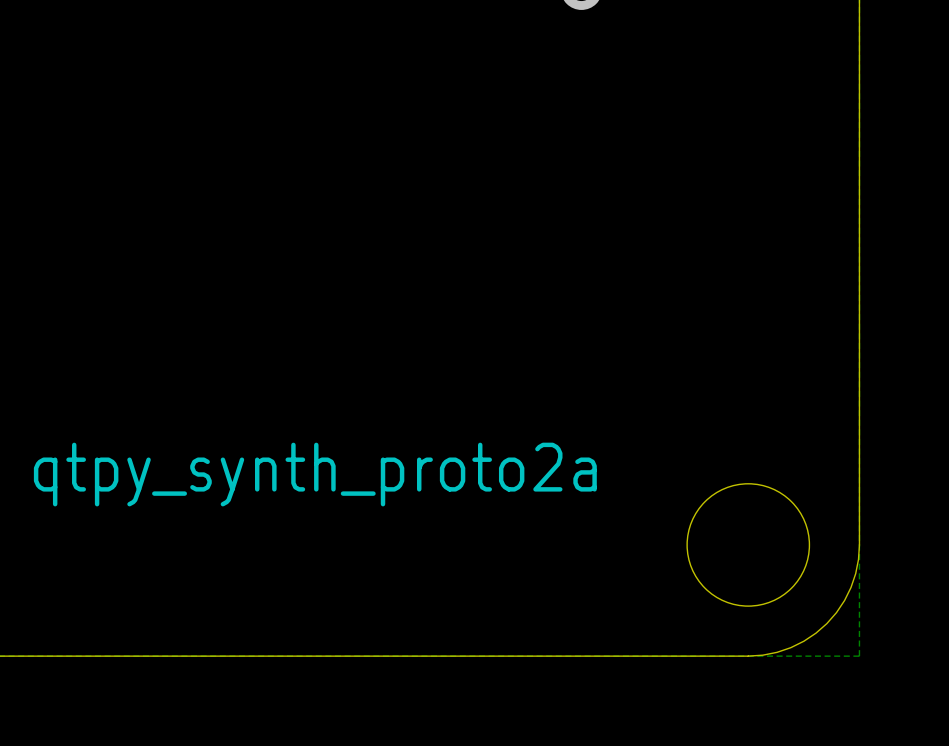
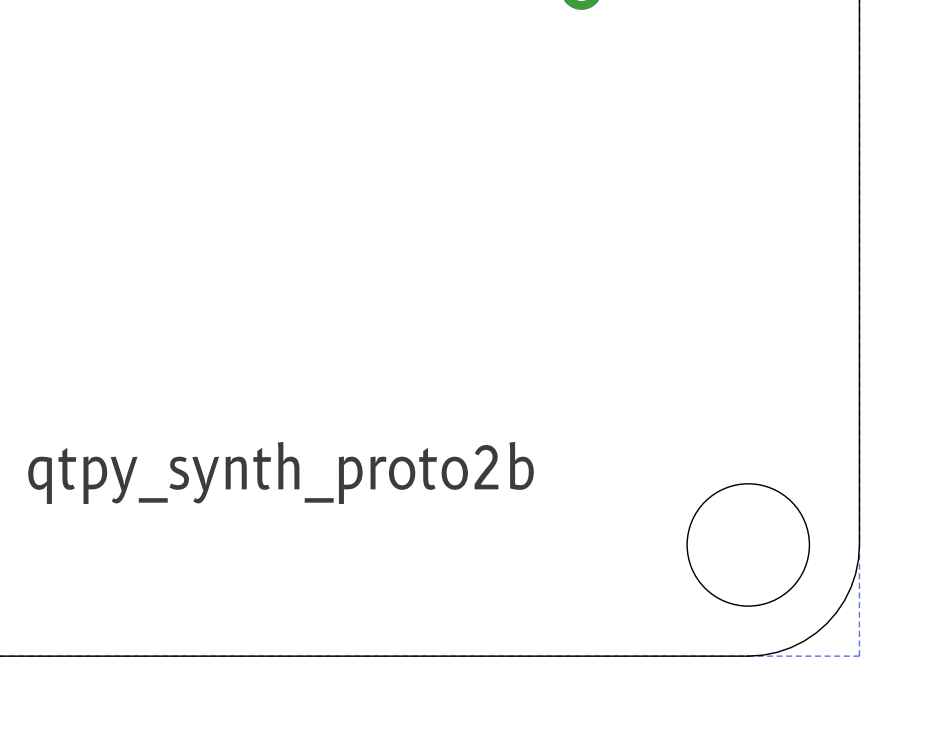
text: qtpy_synth_proto2a (315, 474) -> qtpy_synth_proto2b (280, 472)

